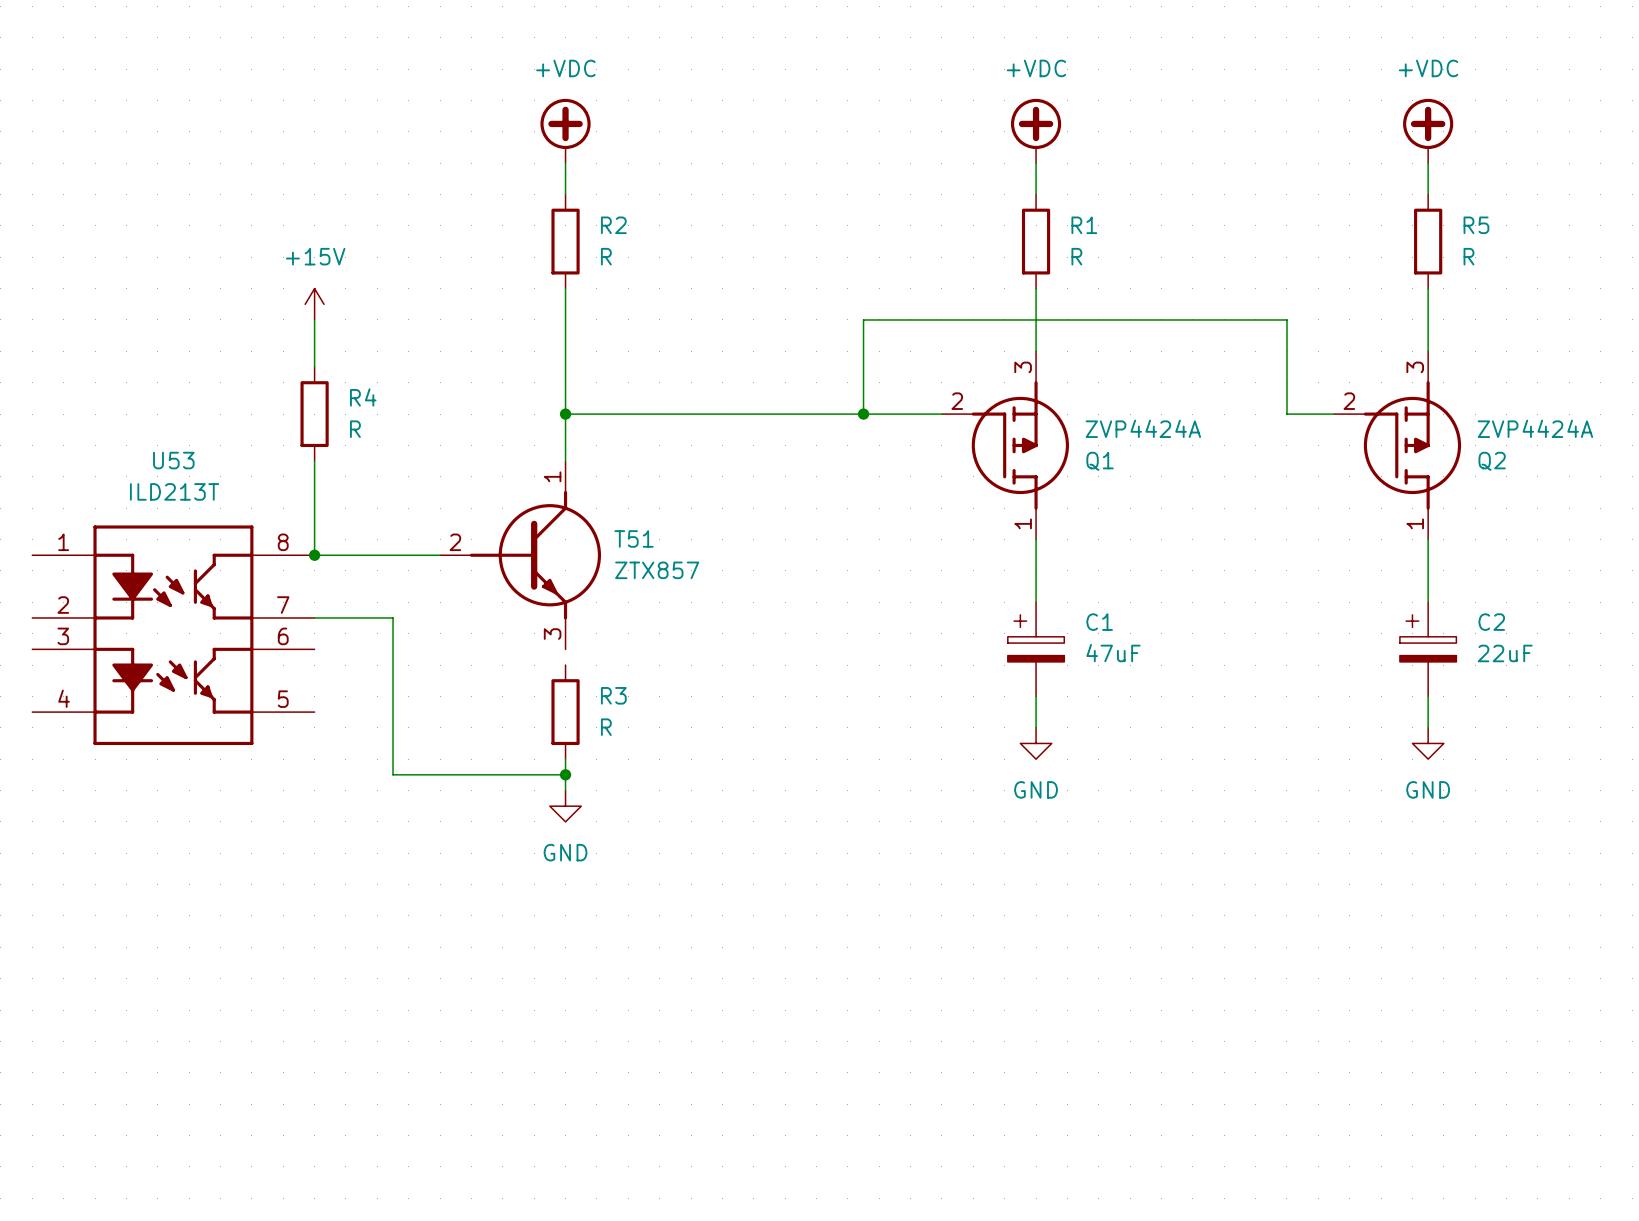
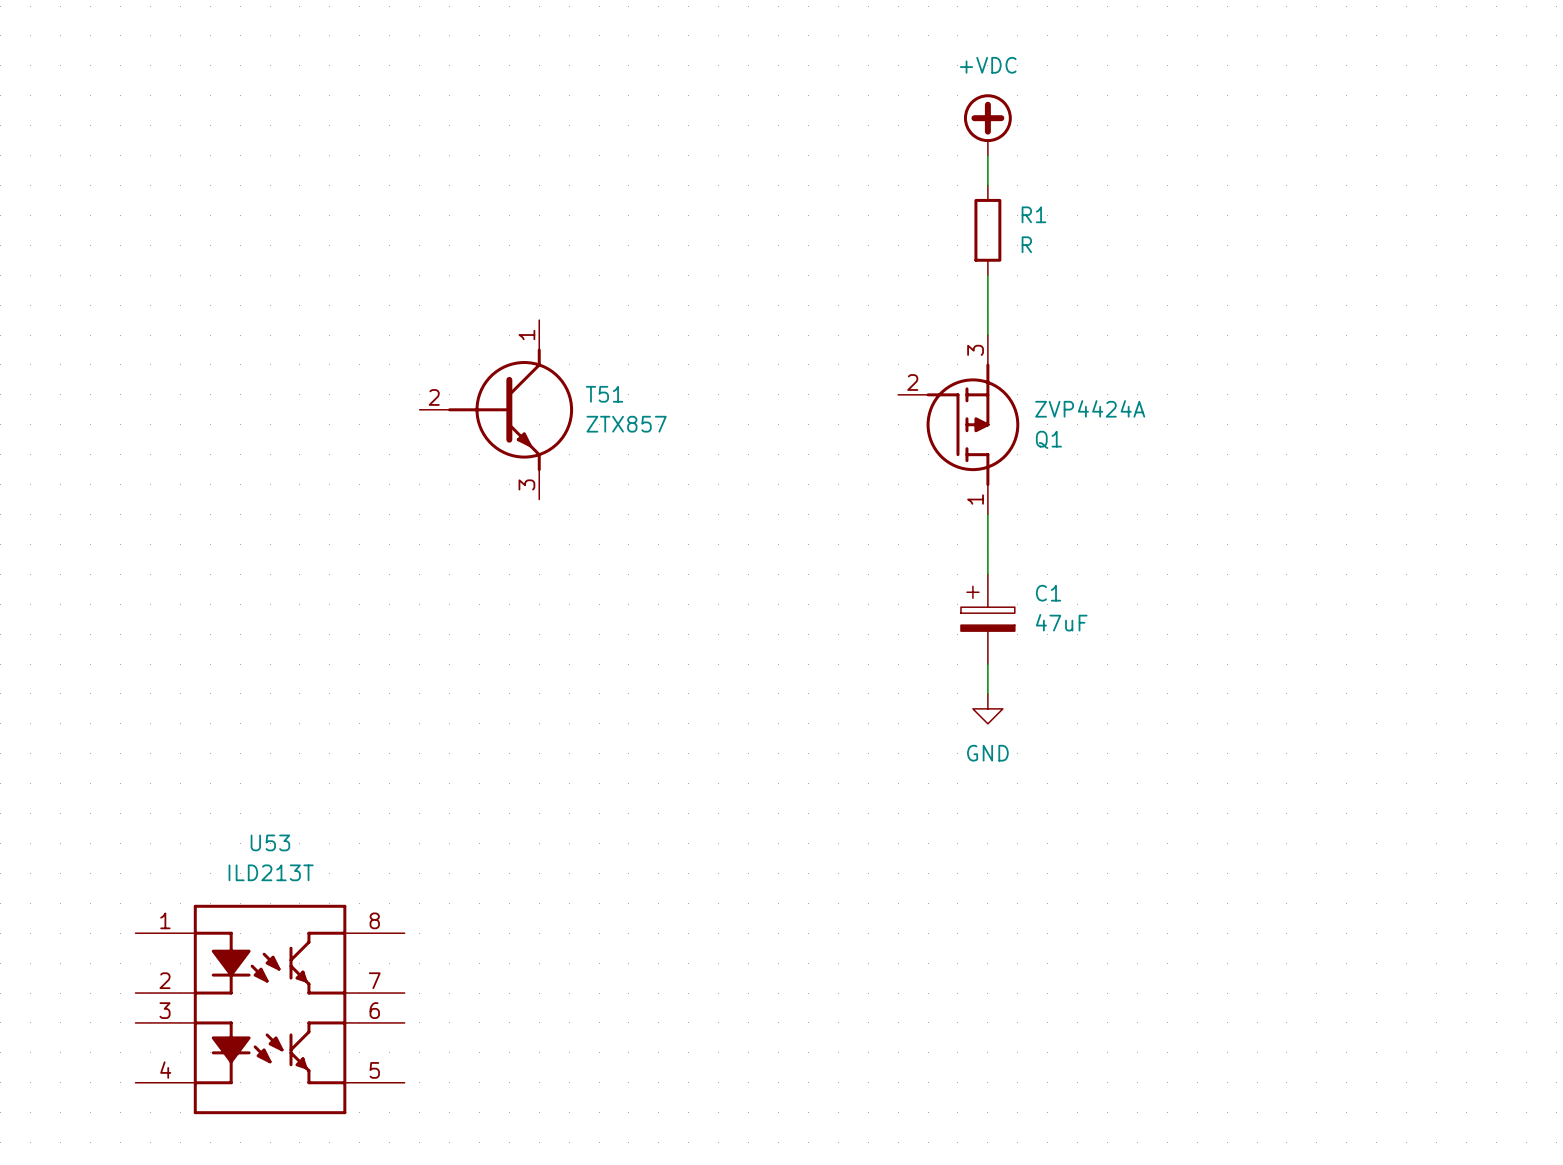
power symbol: +VDC (565, 131) -> none
power symbol: +VDC (1428, 131) -> none
wire: (565, 163) (565, 194) -> none
wire: (1428, 163) (1428, 194) -> none
R2: R (565, 241) -> none
R5: R (1428, 241) -> none
wire: (565, 288) (565, 461) -> none
wire: (1428, 288) (1428, 351) -> none
power symbol: +15V (314, 304) -> none
wire: (314, 319) (314, 367) -> none
R4: R (314, 414) -> none
wire: (565, 414) (941, 414) -> none
junction: (565, 414) -> none
wire: (863, 414) (863, 319) (1286, 319) (1286, 414) (1334, 414) -> none
junction: (863, 414) -> none
Q2: ZVP4424A (1397, 445) -> none
wire: (314, 461) (314, 555) (440, 555) -> none
wire: (1428, 539) (1428, 602) -> none
junction: (314, 555) -> none
T51 position: (520, 555) -> (496, 409)
wire: (314, 617) (393, 617) (393, 774) (565, 774) -> none
U53 position: (173, 635) -> (270, 1009)
C2: 22uF (1428, 649) -> none
wire: (1428, 696) (1428, 727) -> none
R3: R (565, 712) -> none
power symbol: GND (1428, 743) -> none
wire: (565, 759) (565, 790) -> none
junction: (565, 774) -> none
power symbol: GND (565, 806) -> none

